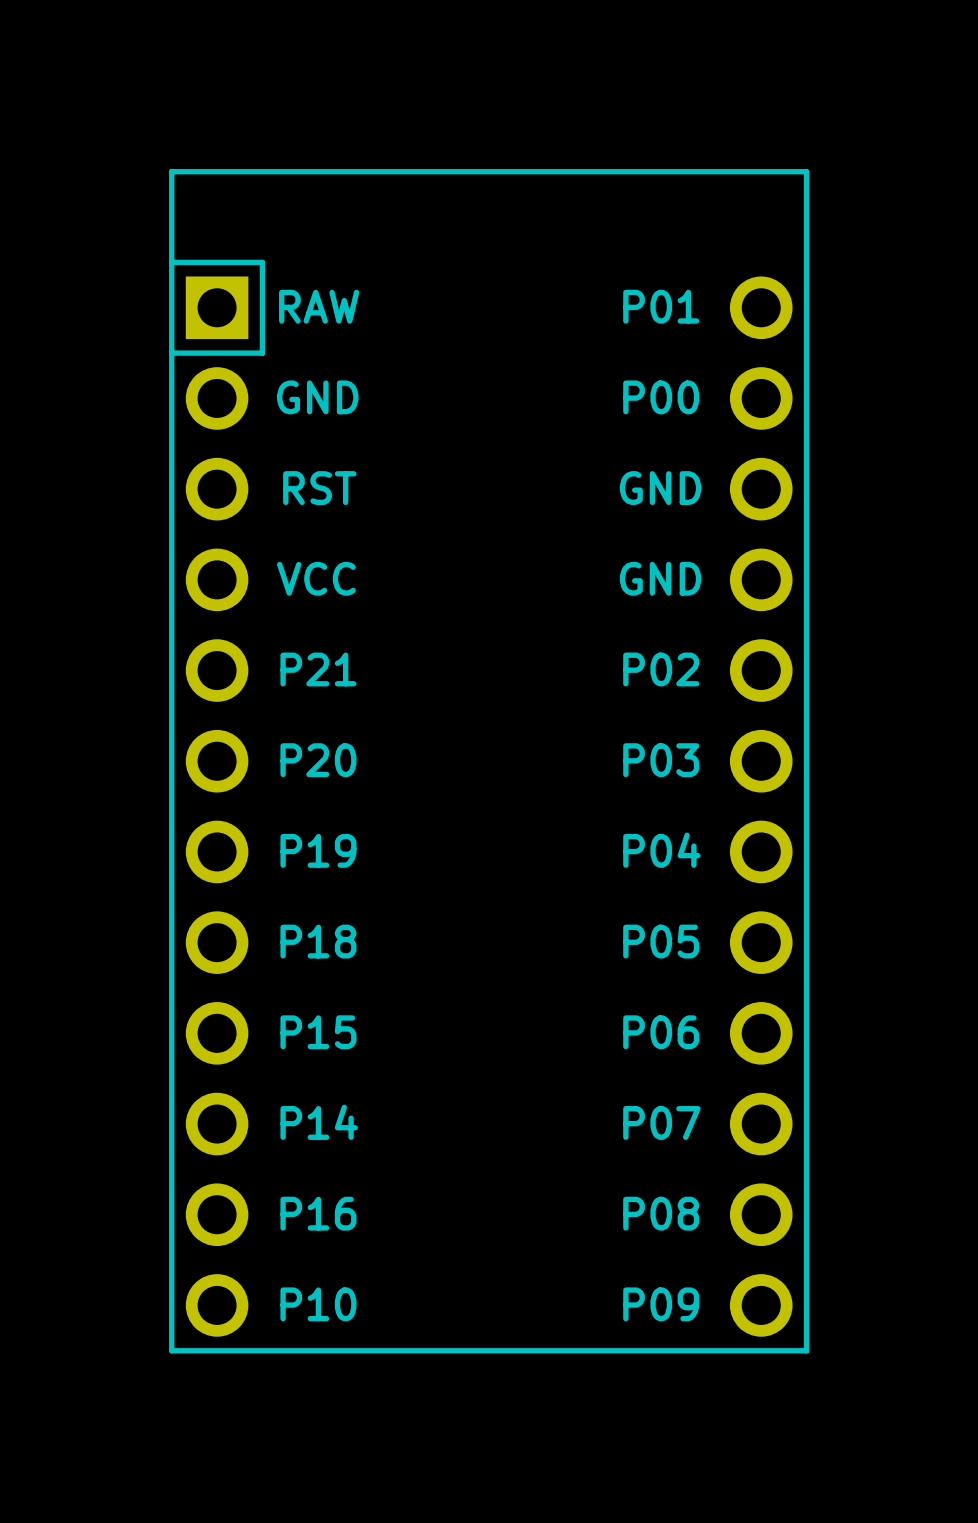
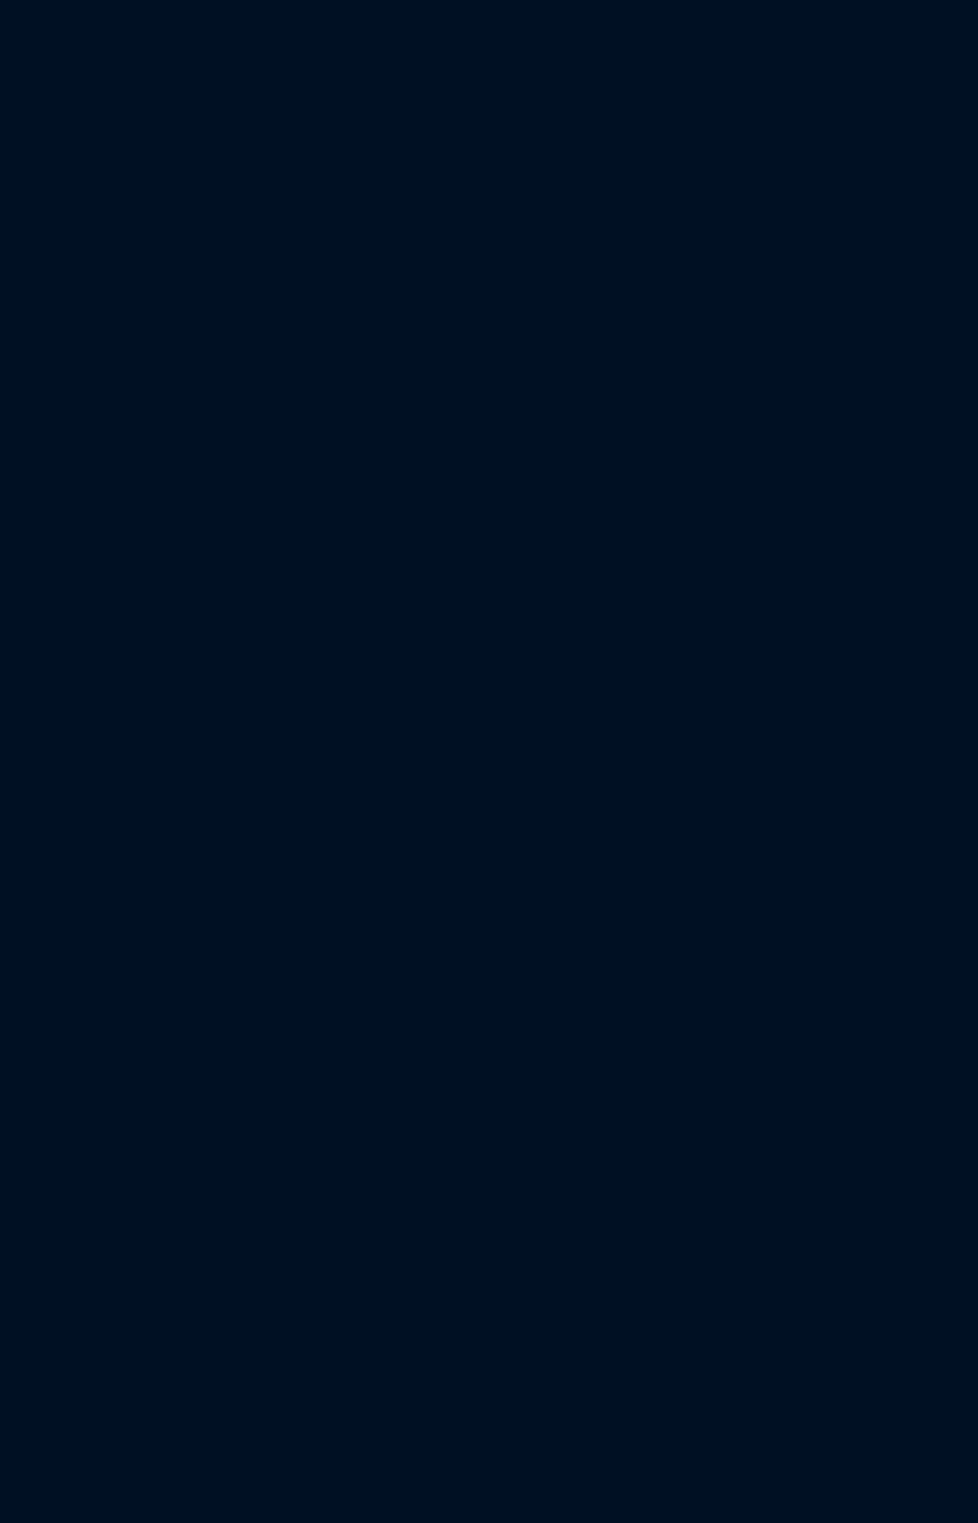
part: (489, 761) -> none

